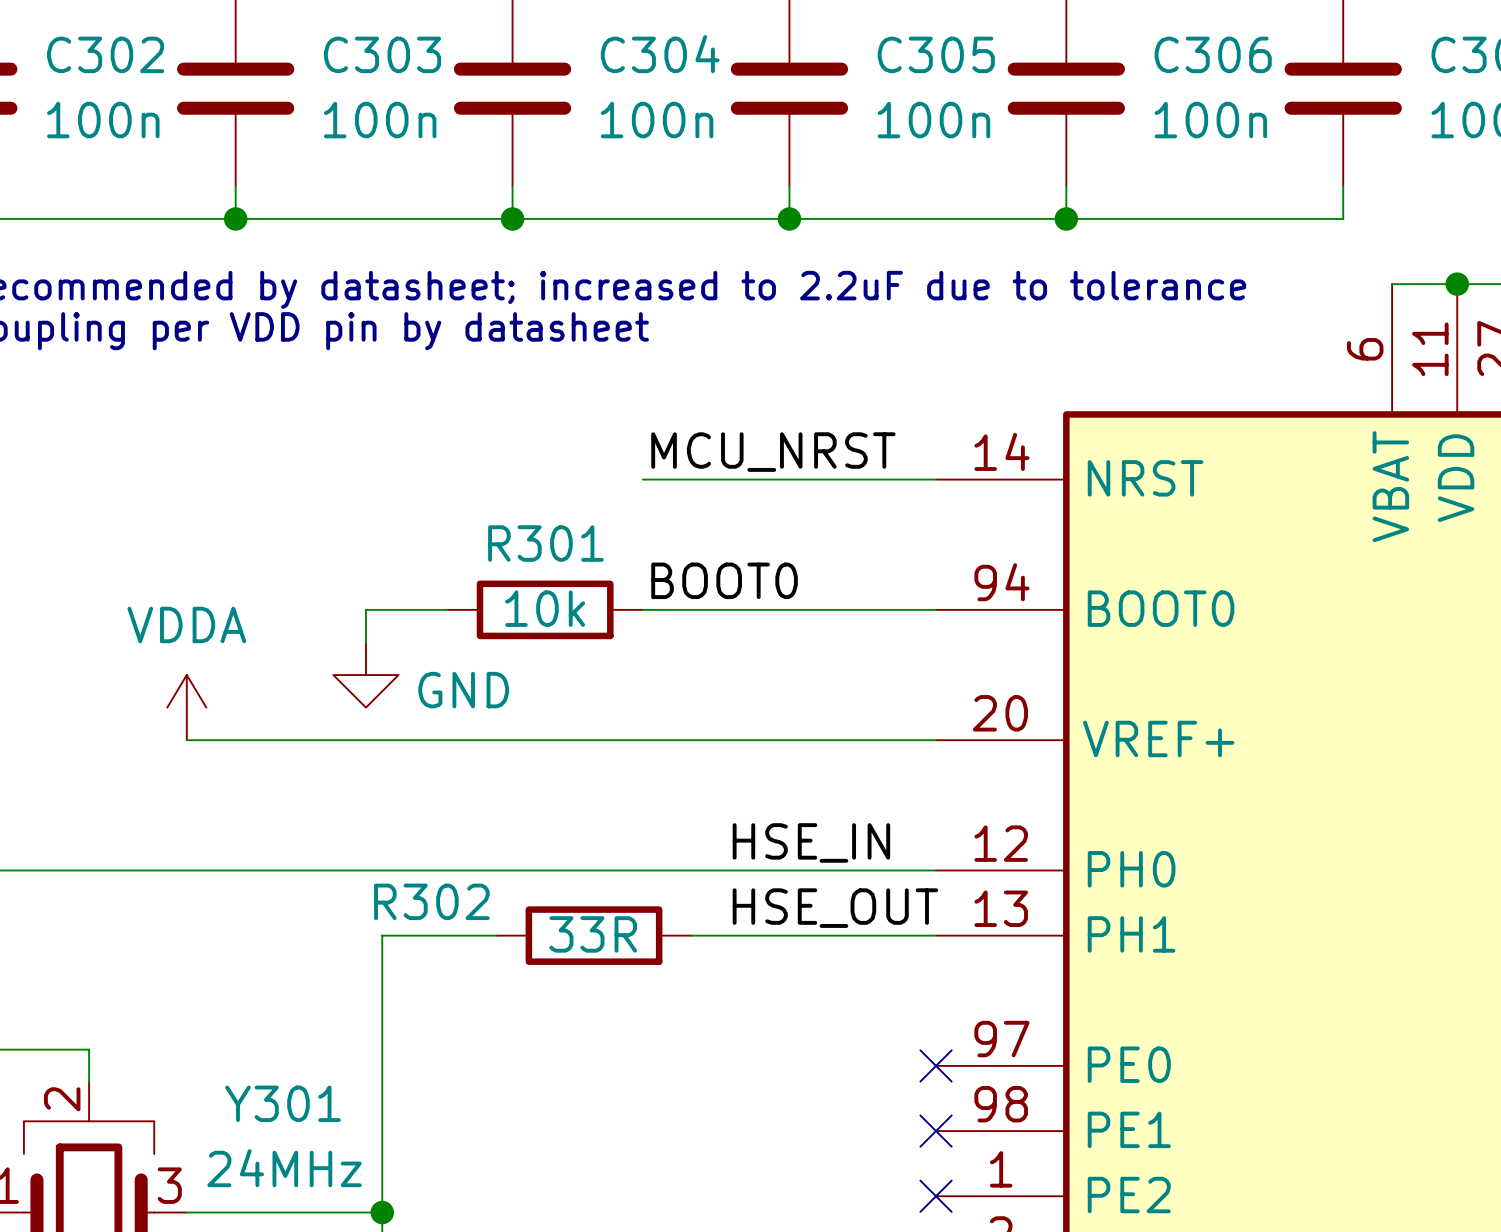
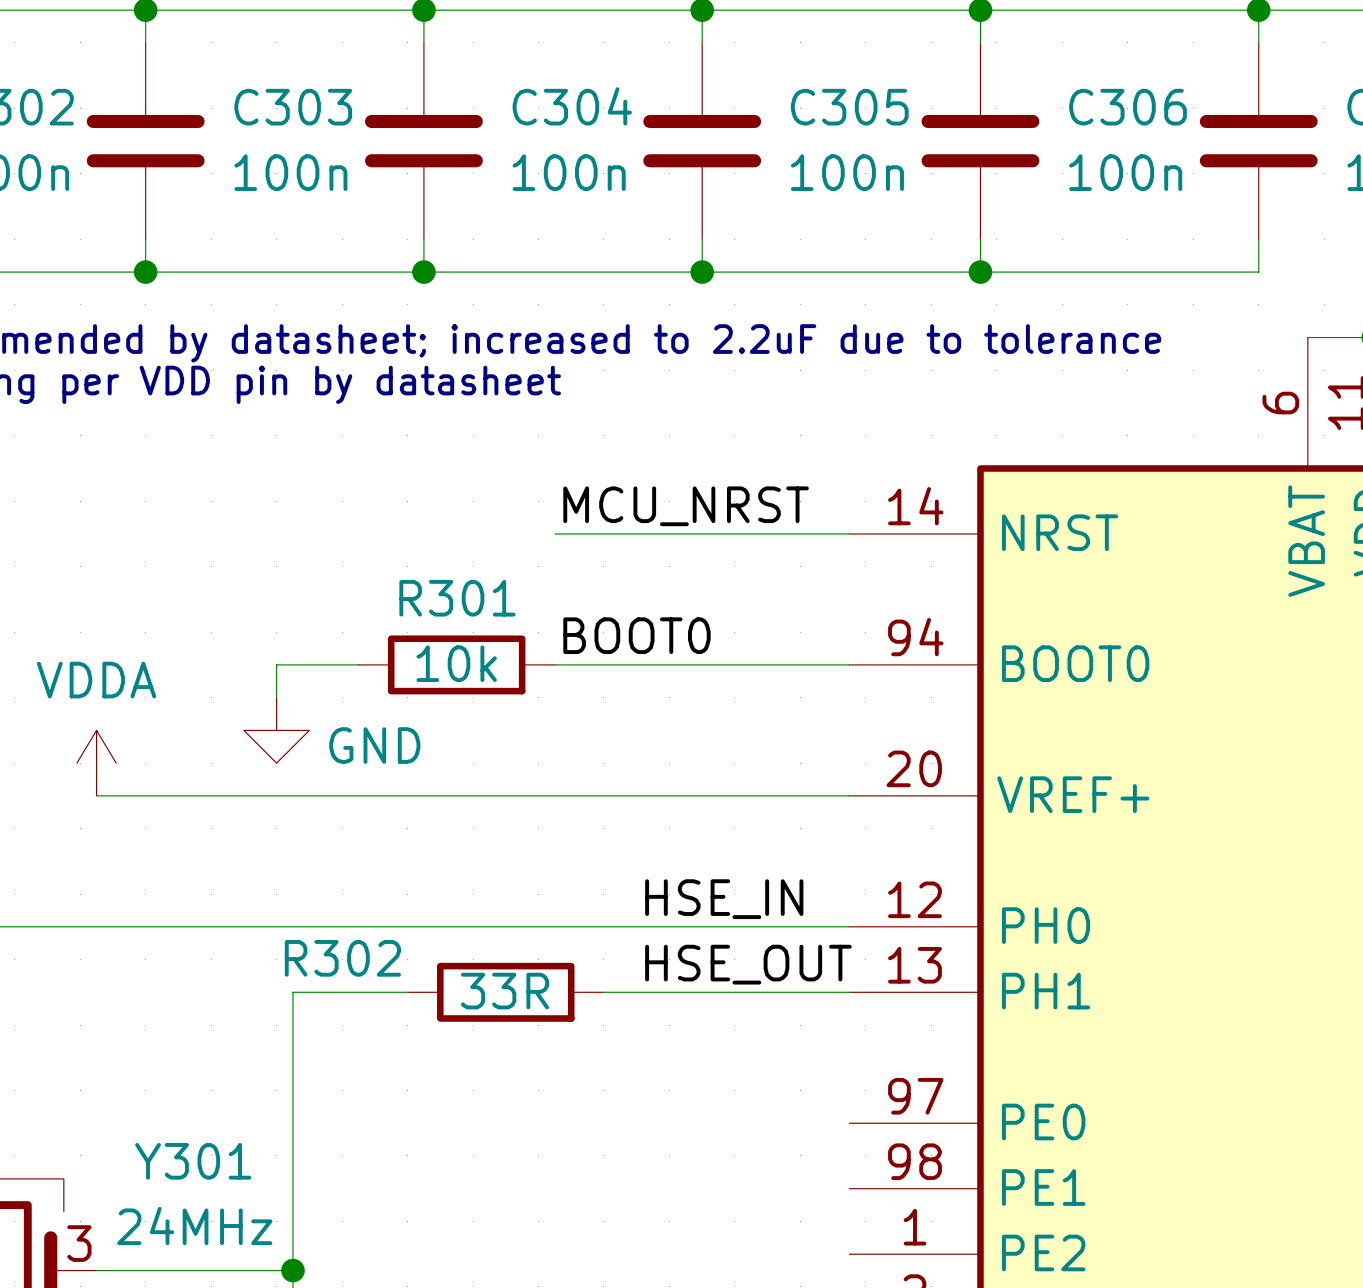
no-connect mark: (936, 1065) -> none
no-connect mark: (936, 1131) -> none
no-connect mark: (936, 1196) -> none

